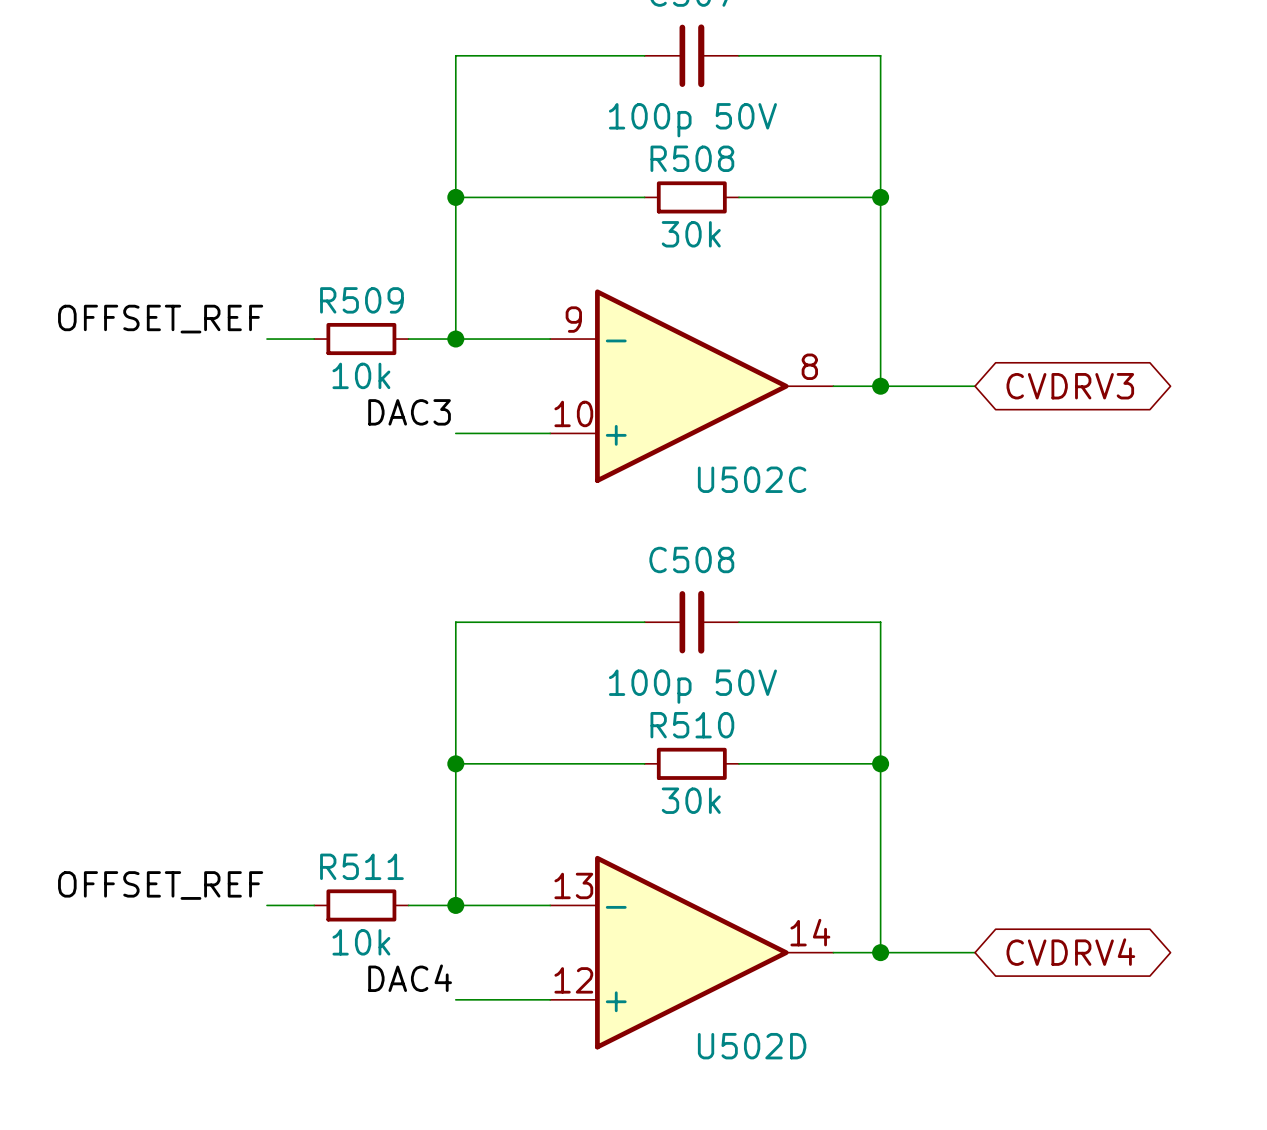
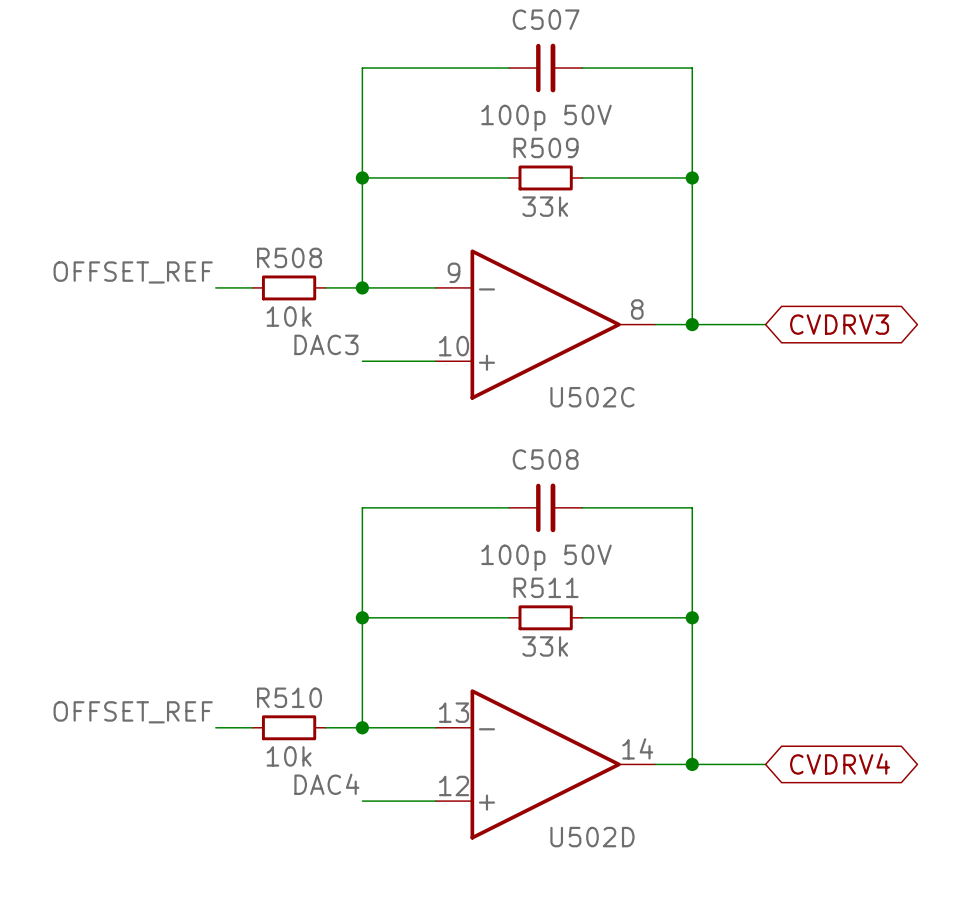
R508 name: R508 (692, 158) -> R509 (546, 147)
R508 value: 30k (691, 234) -> 33k (545, 206)
R509 name: R509 (361, 300) -> R508 (289, 257)
R510 name: R510 (692, 725) -> R511 (546, 587)
R510 value: 30k (691, 800) -> 33k (545, 646)
R511 name: R511 (361, 866) -> R510 (289, 697)

